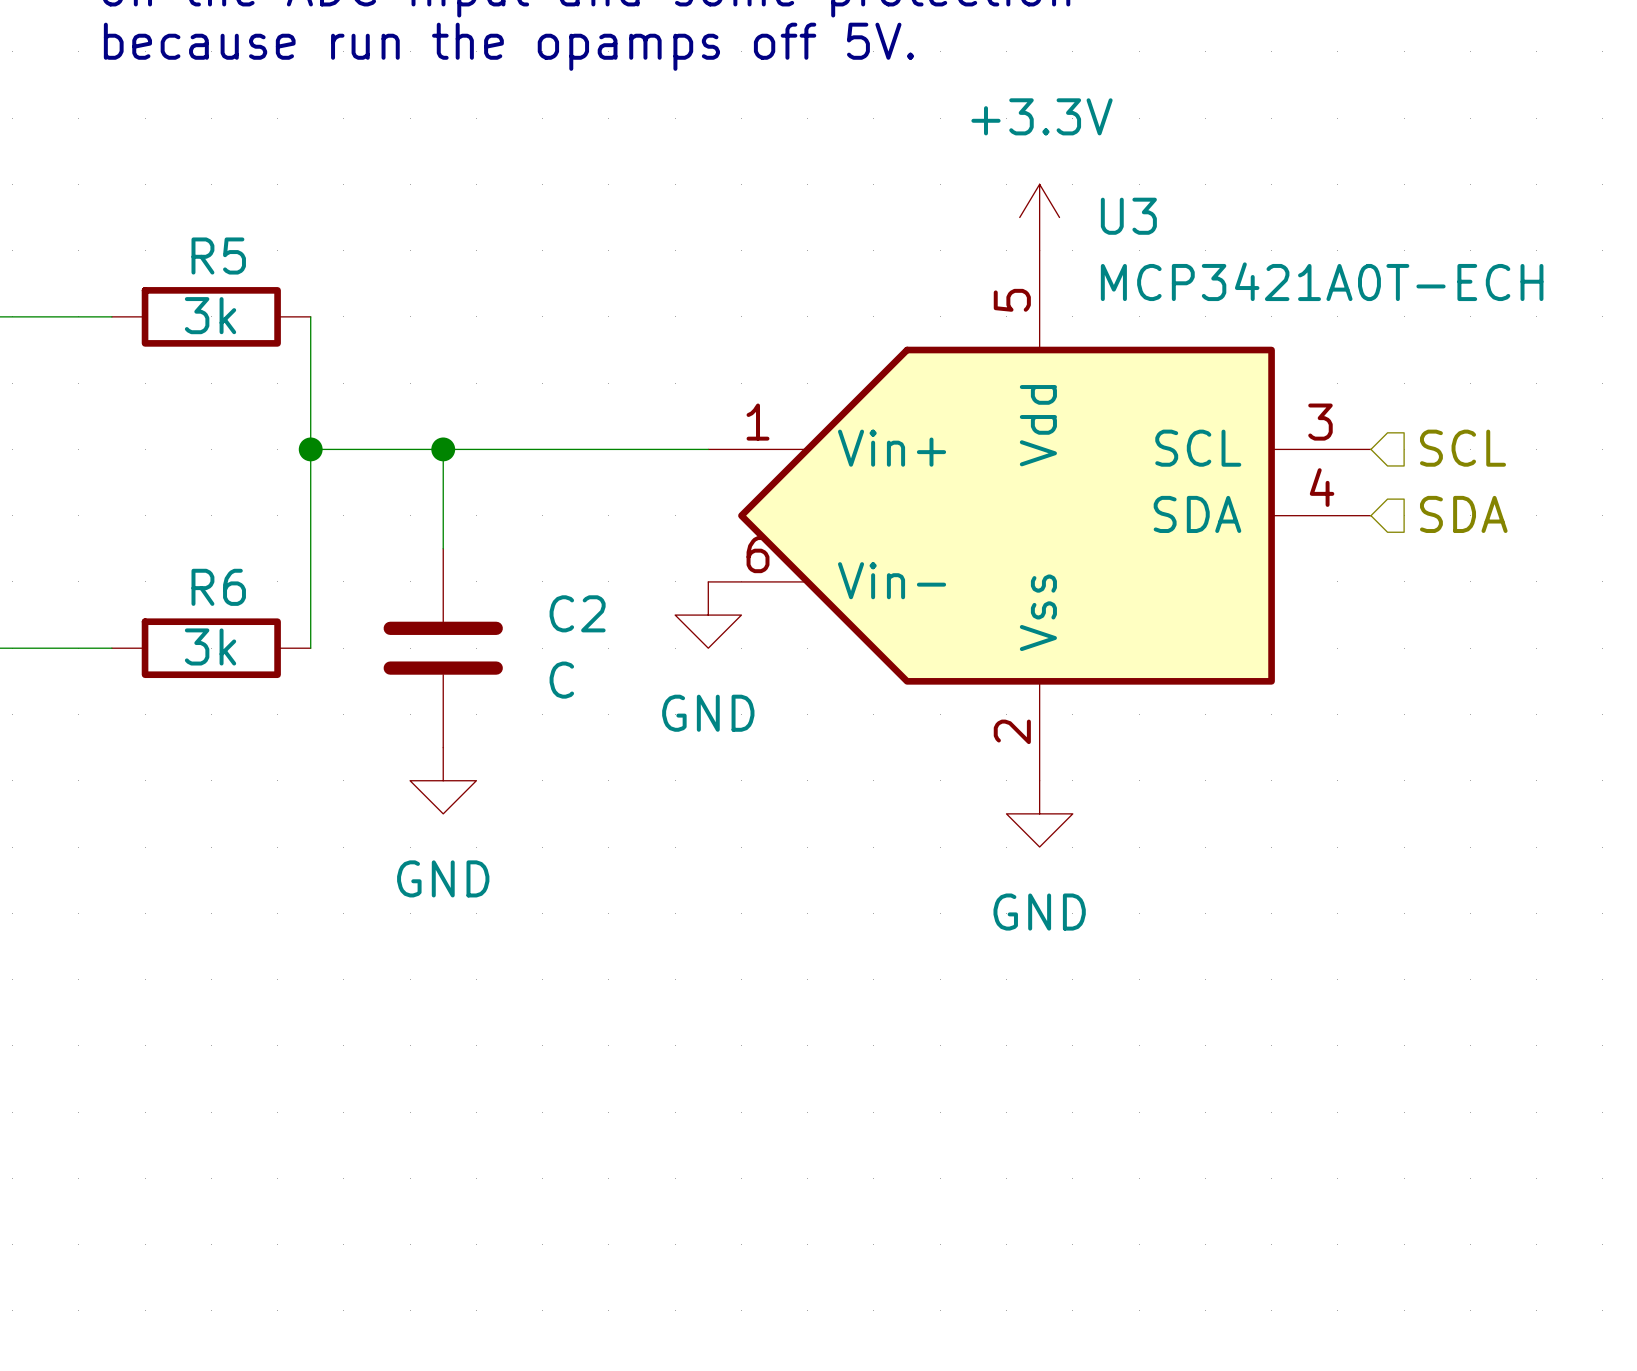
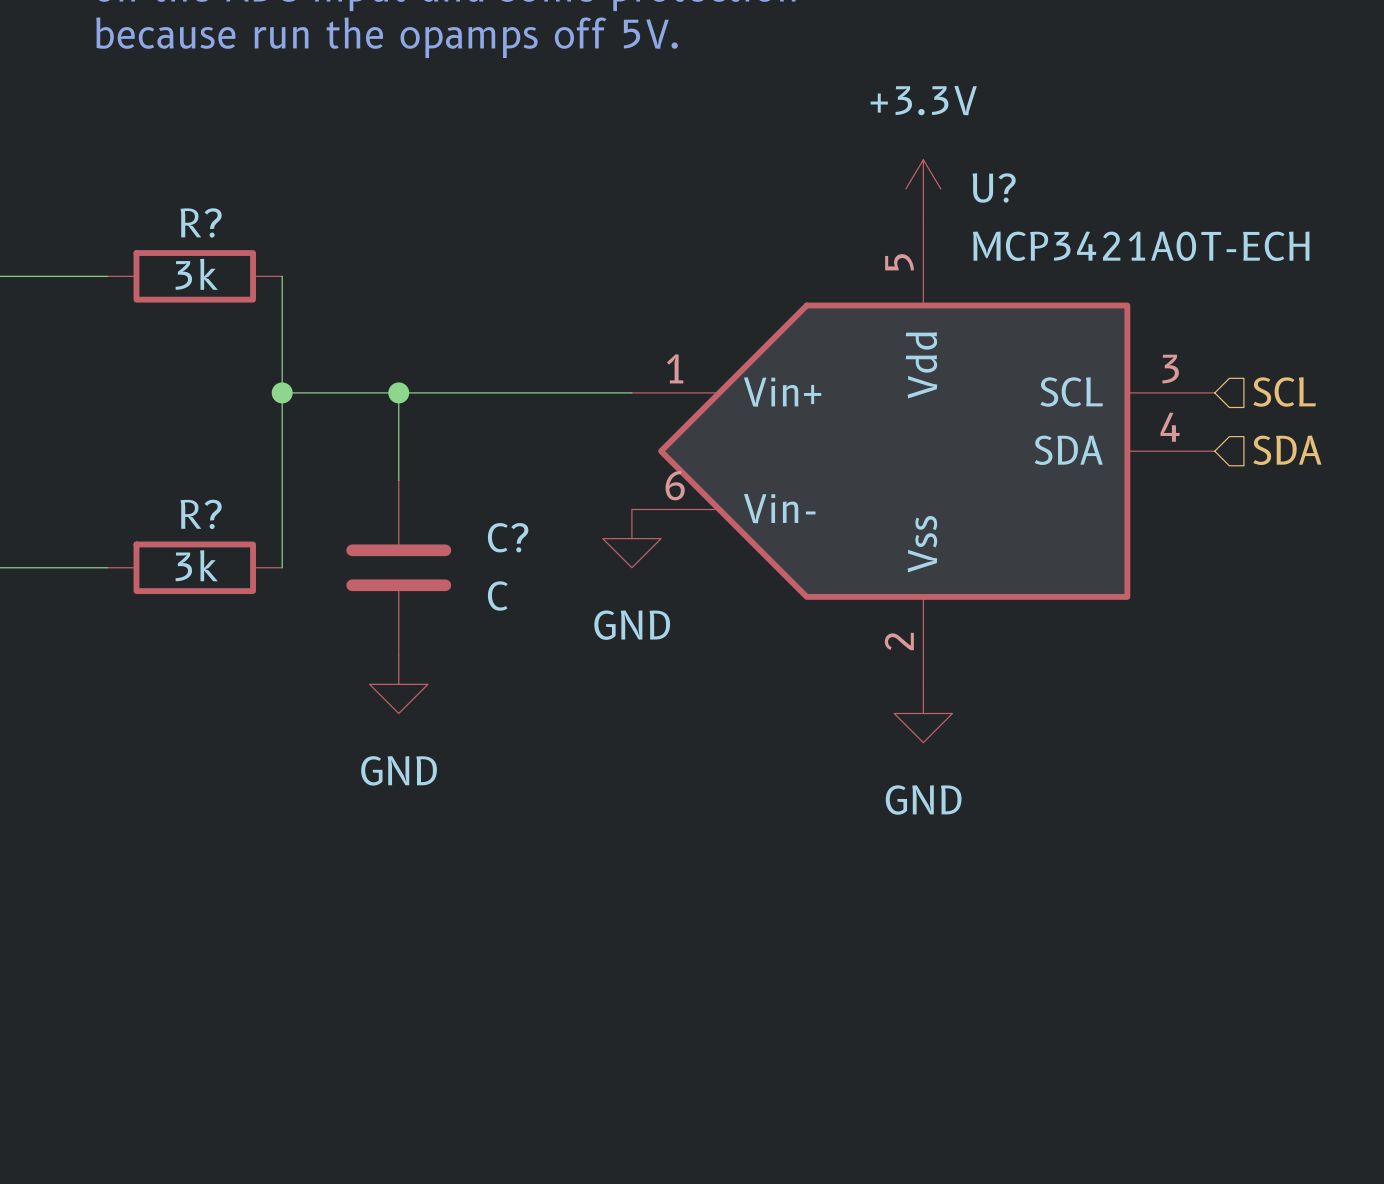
U3 name: U3 (1128, 216) -> U? (994, 187)
R5 name: R5 (218, 256) -> R? (201, 222)
R6 name: R6 (218, 587) -> R? (201, 514)
C2 name: C2 (577, 613) -> C? (508, 537)

